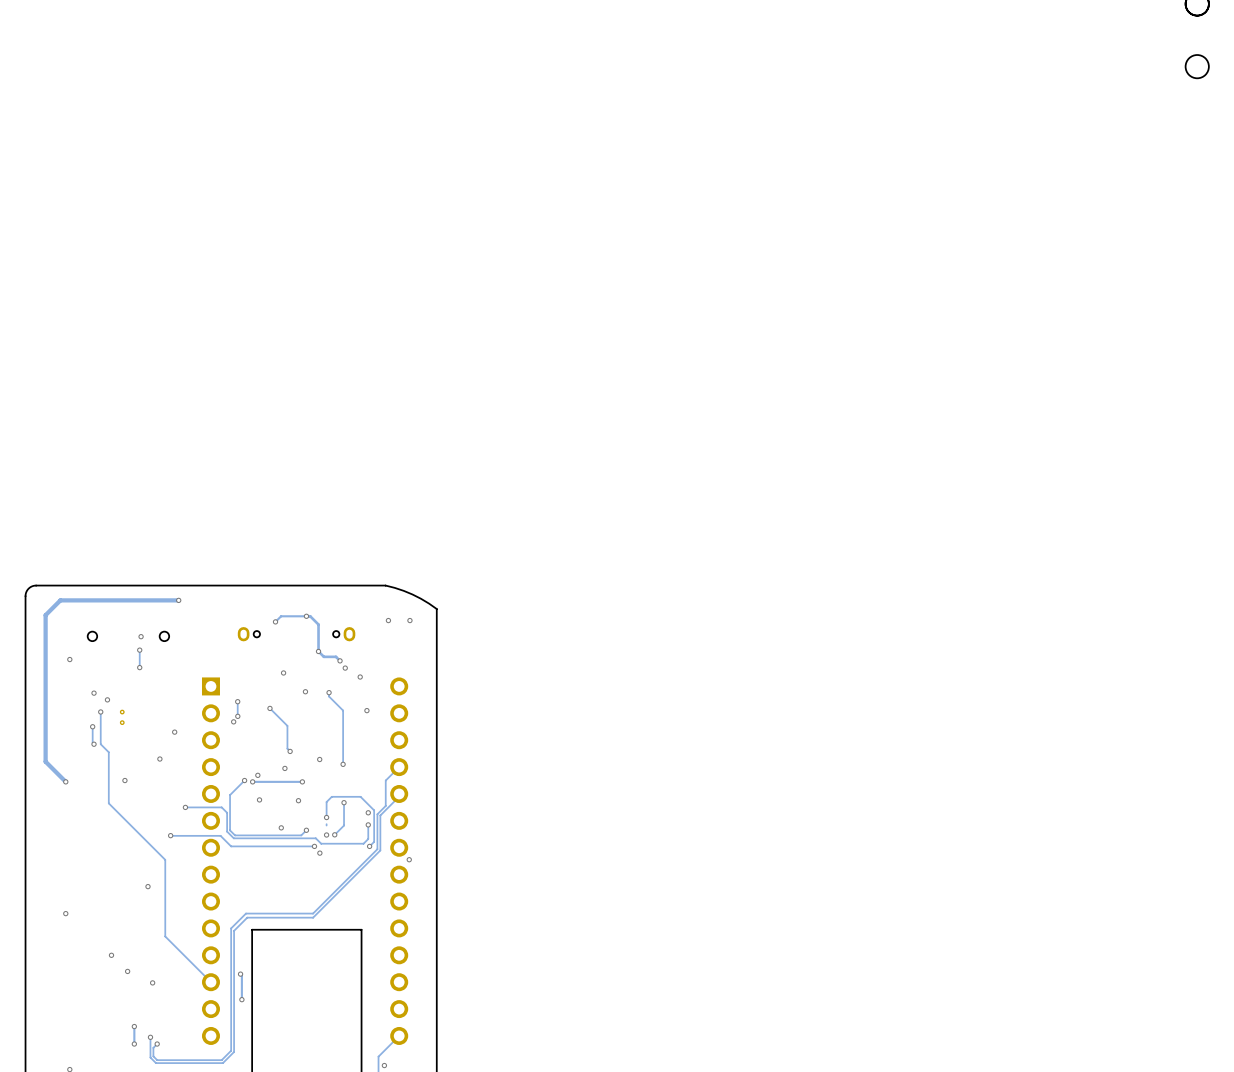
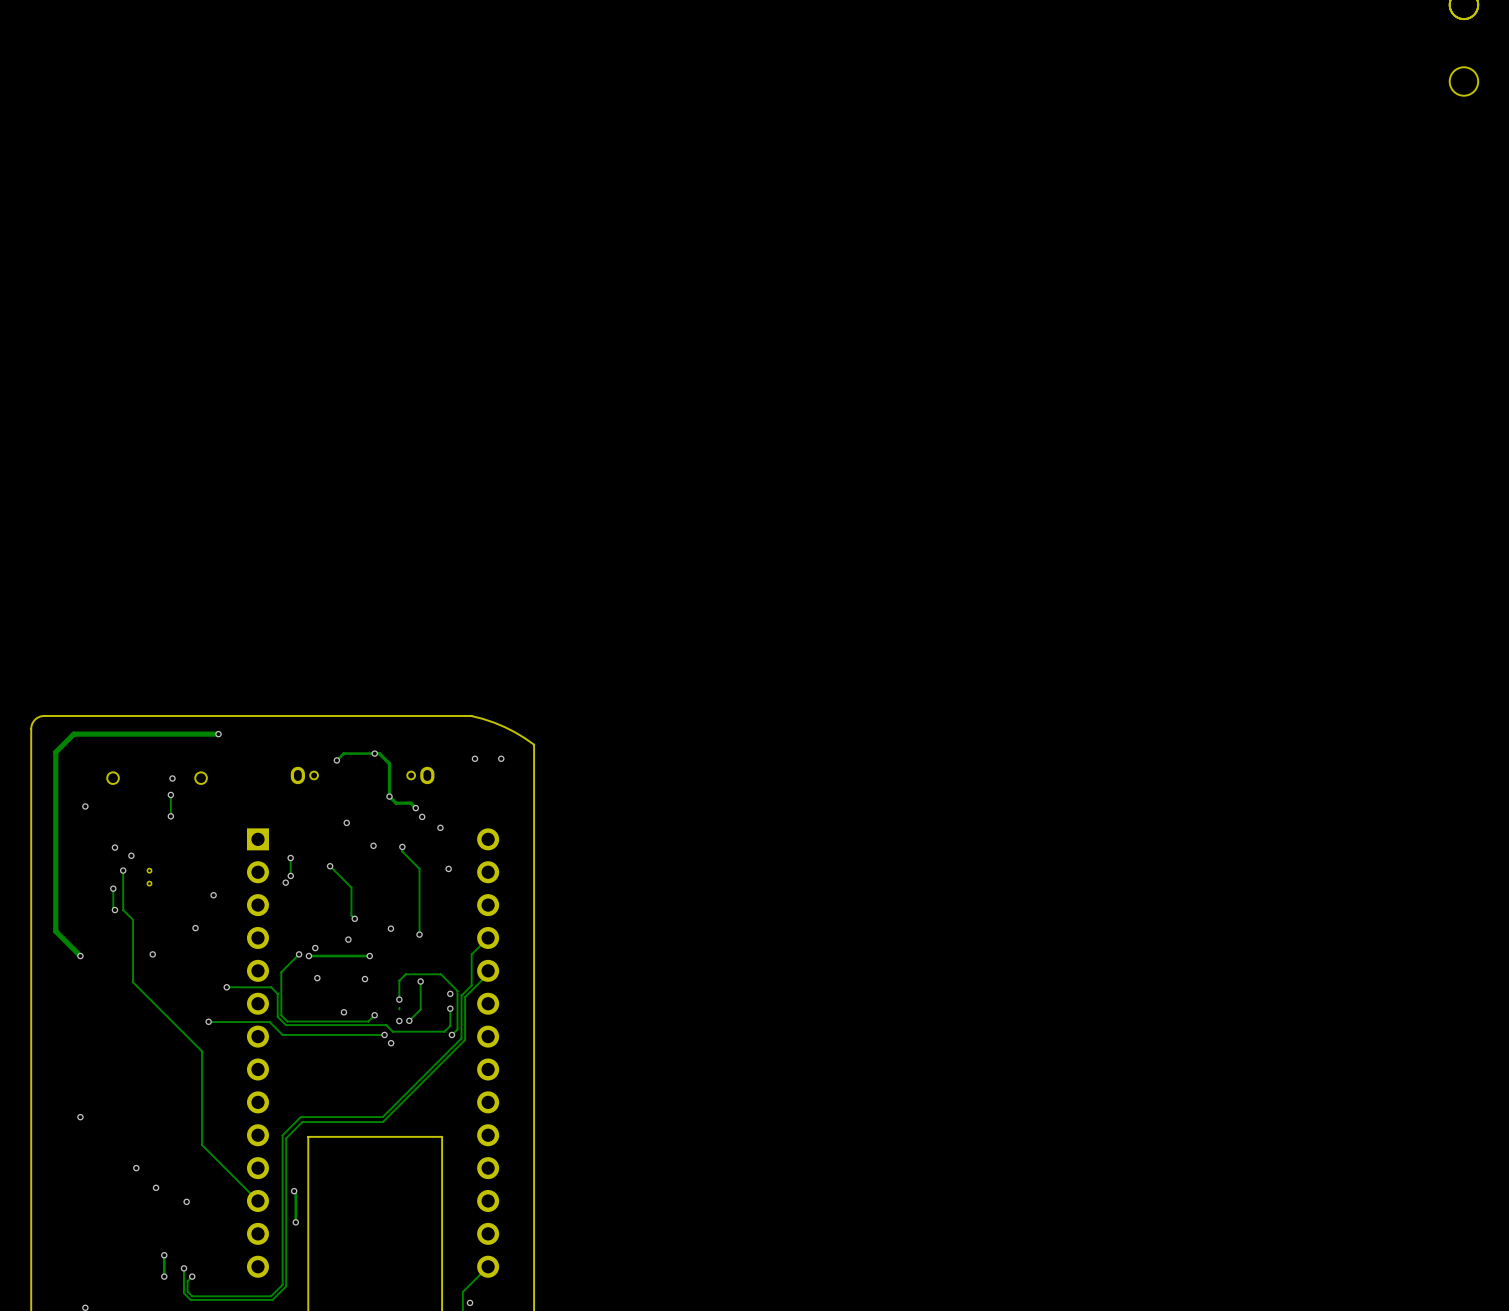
via: (409, 859) -> none
via: (148, 886) -> none

